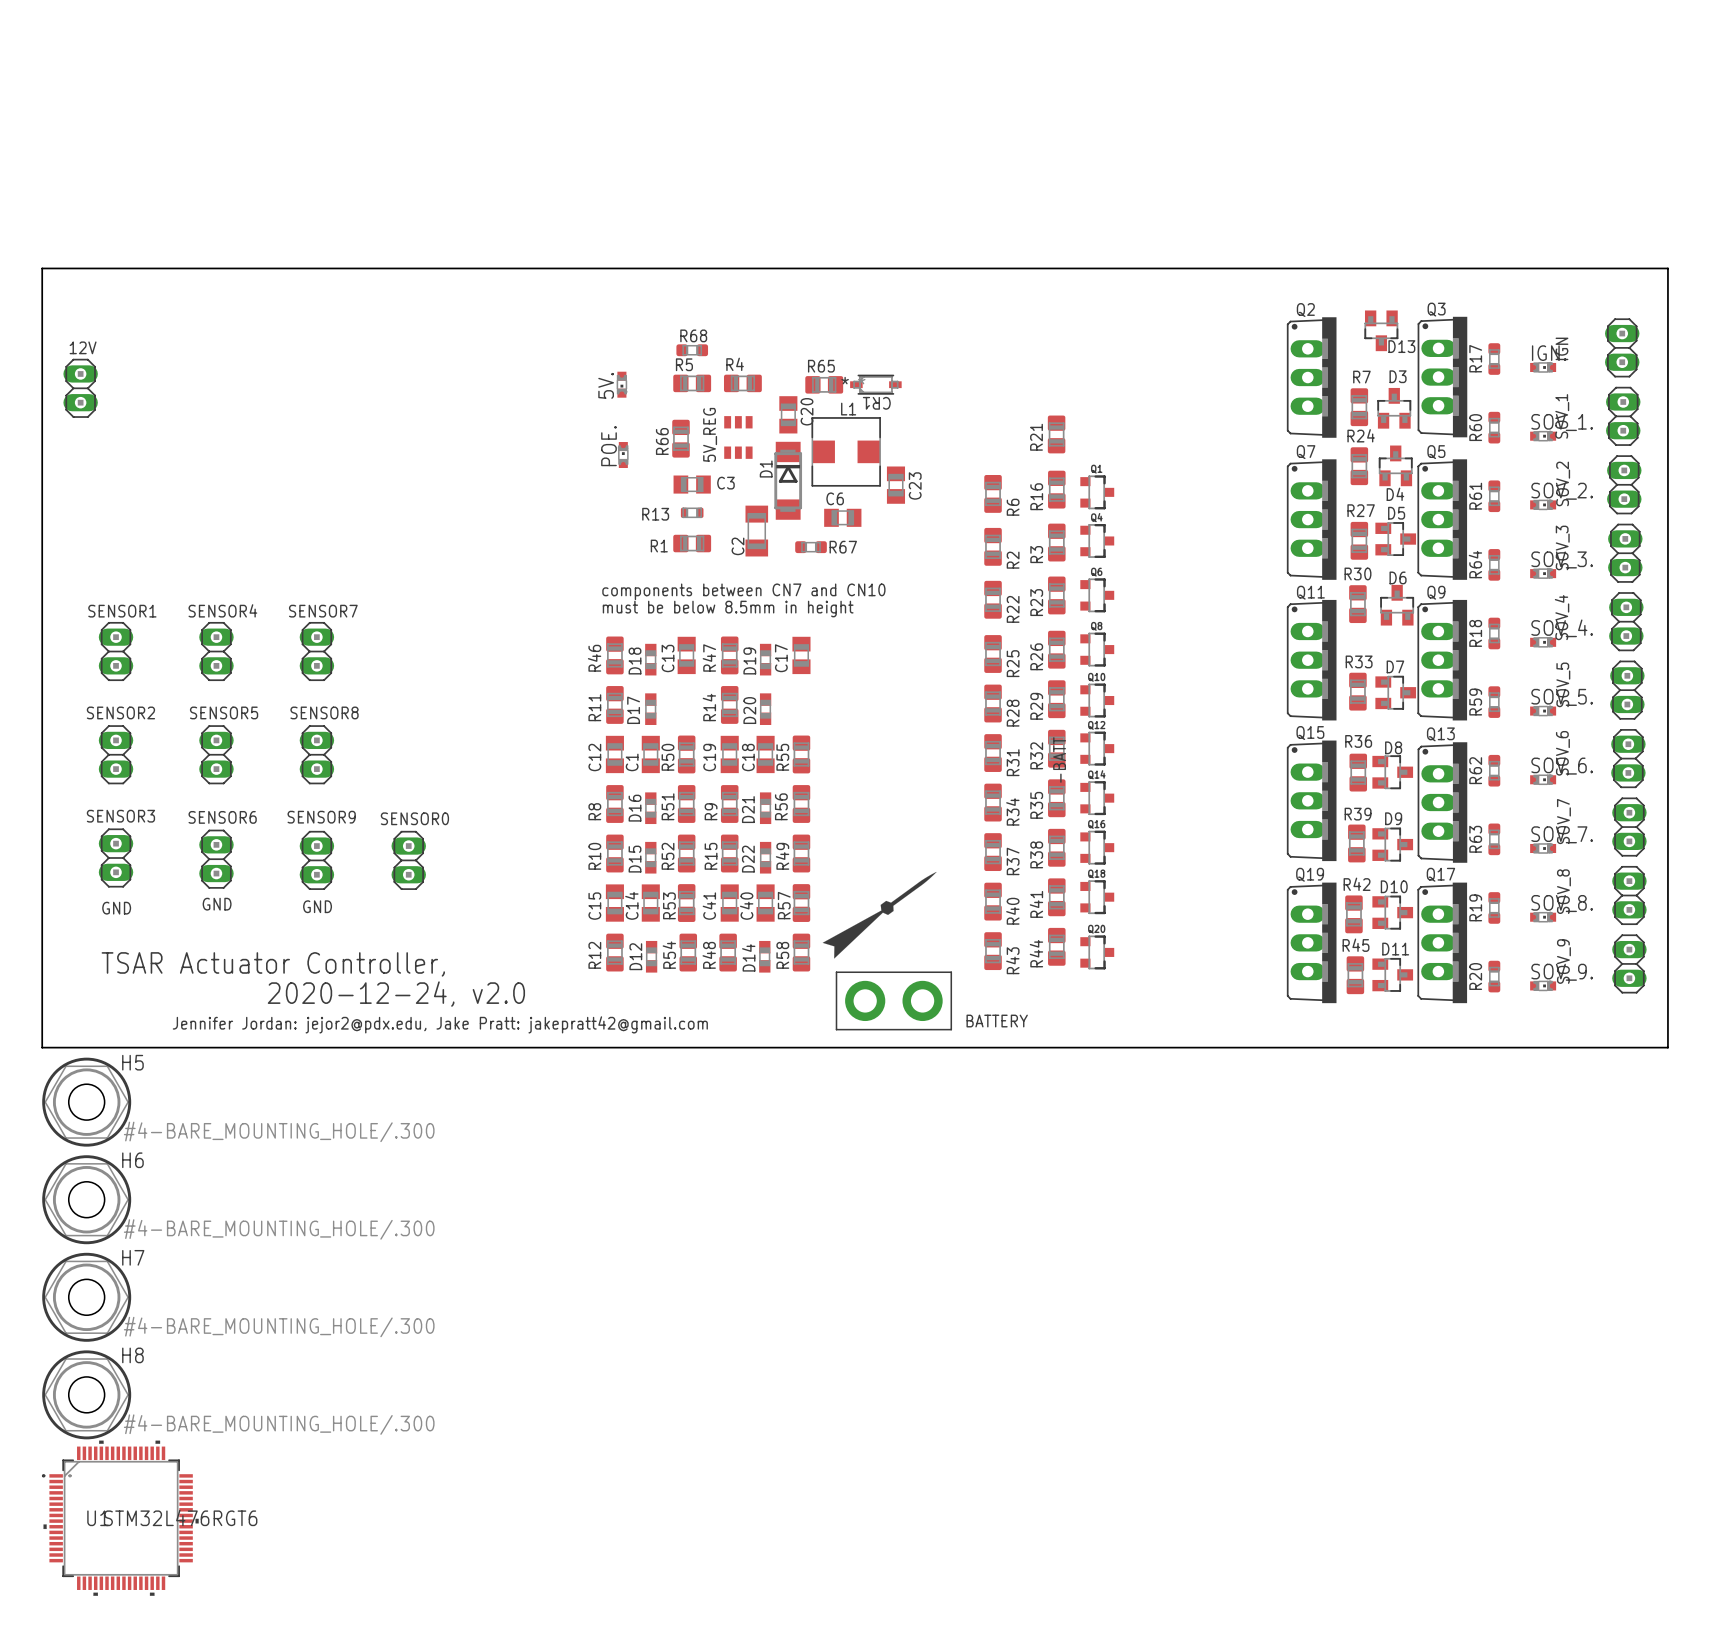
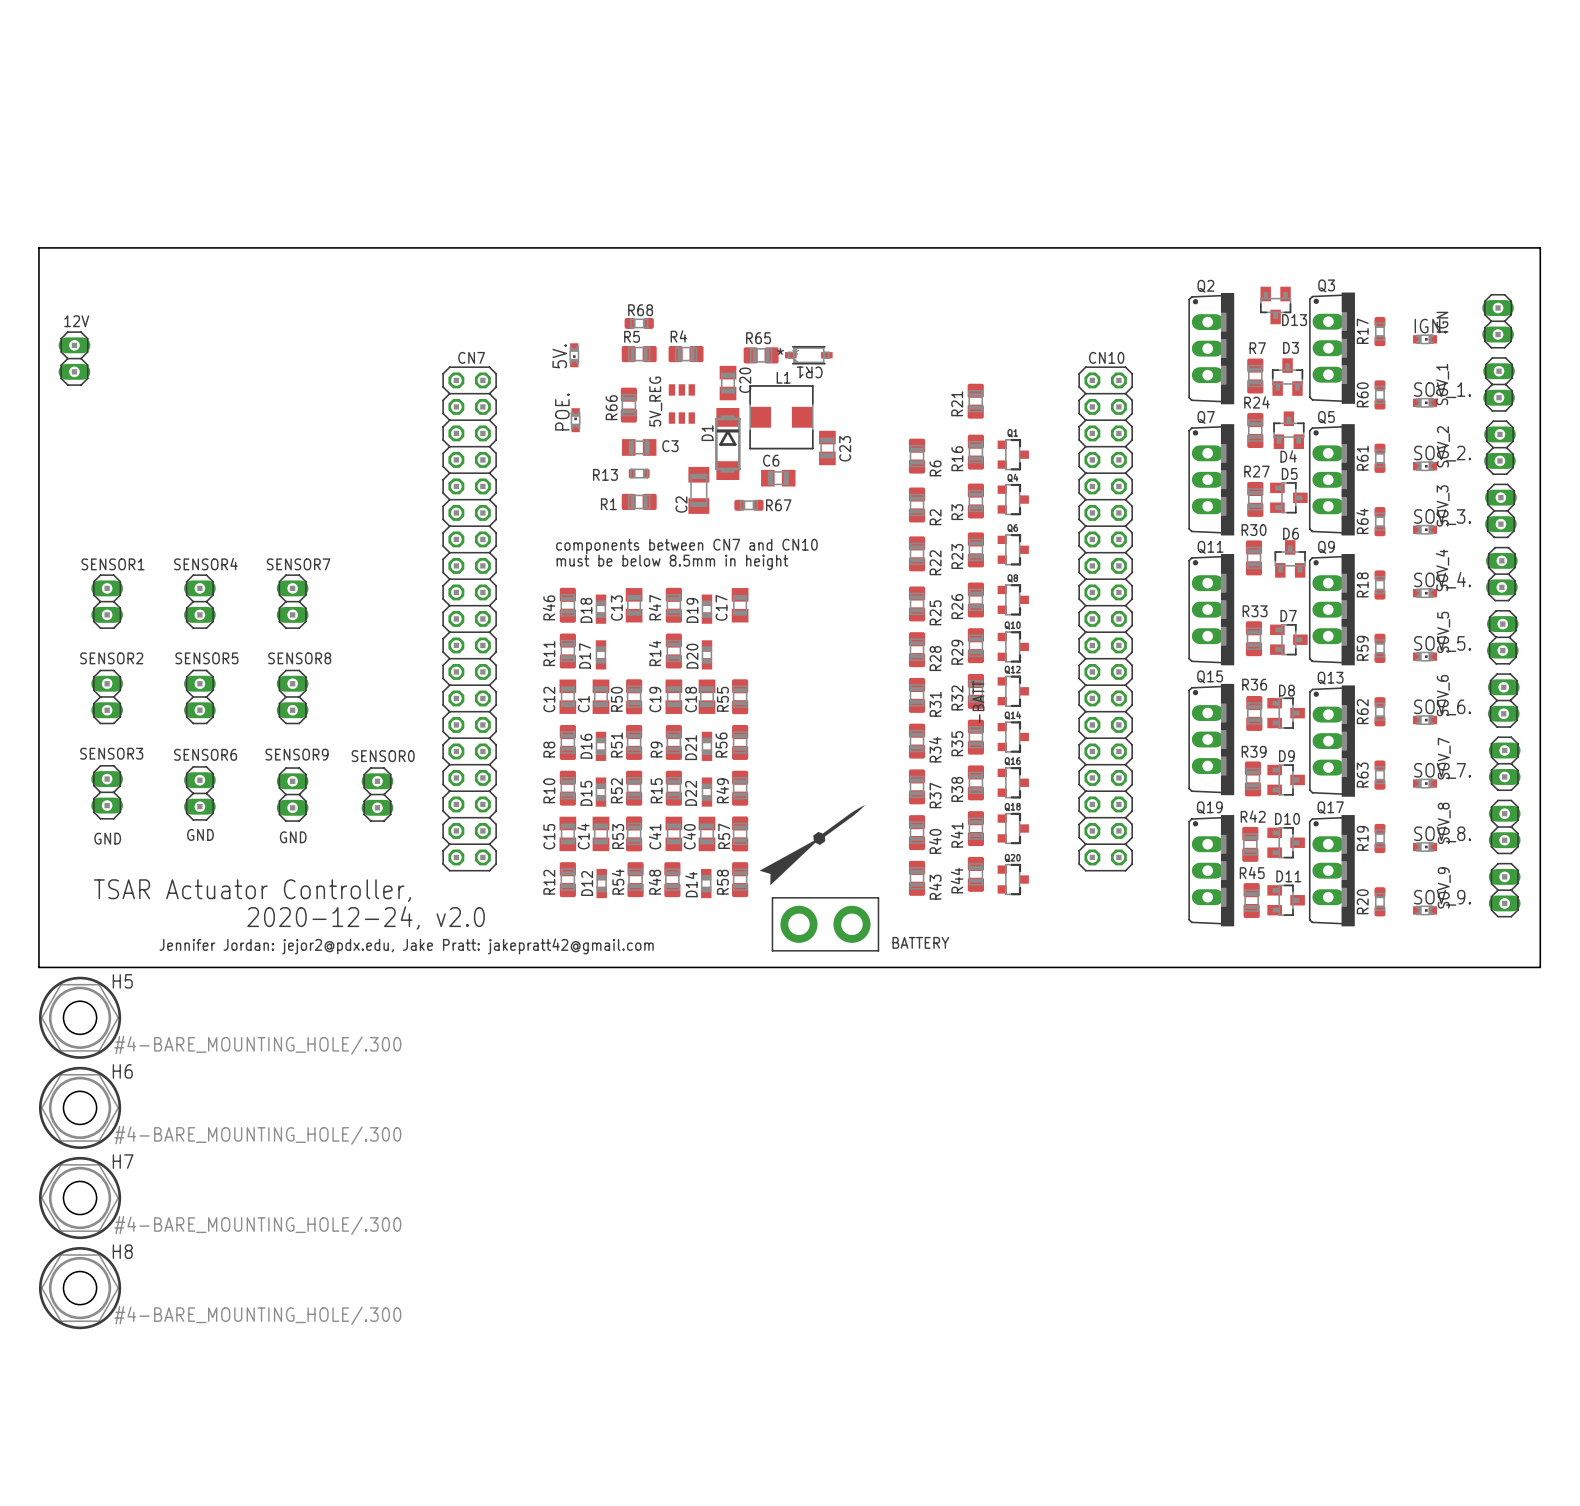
CN7: none -> (469, 618)
CN10: none -> (1105, 618)
U1: STM32L476RGT6 (120, 1518) -> none

